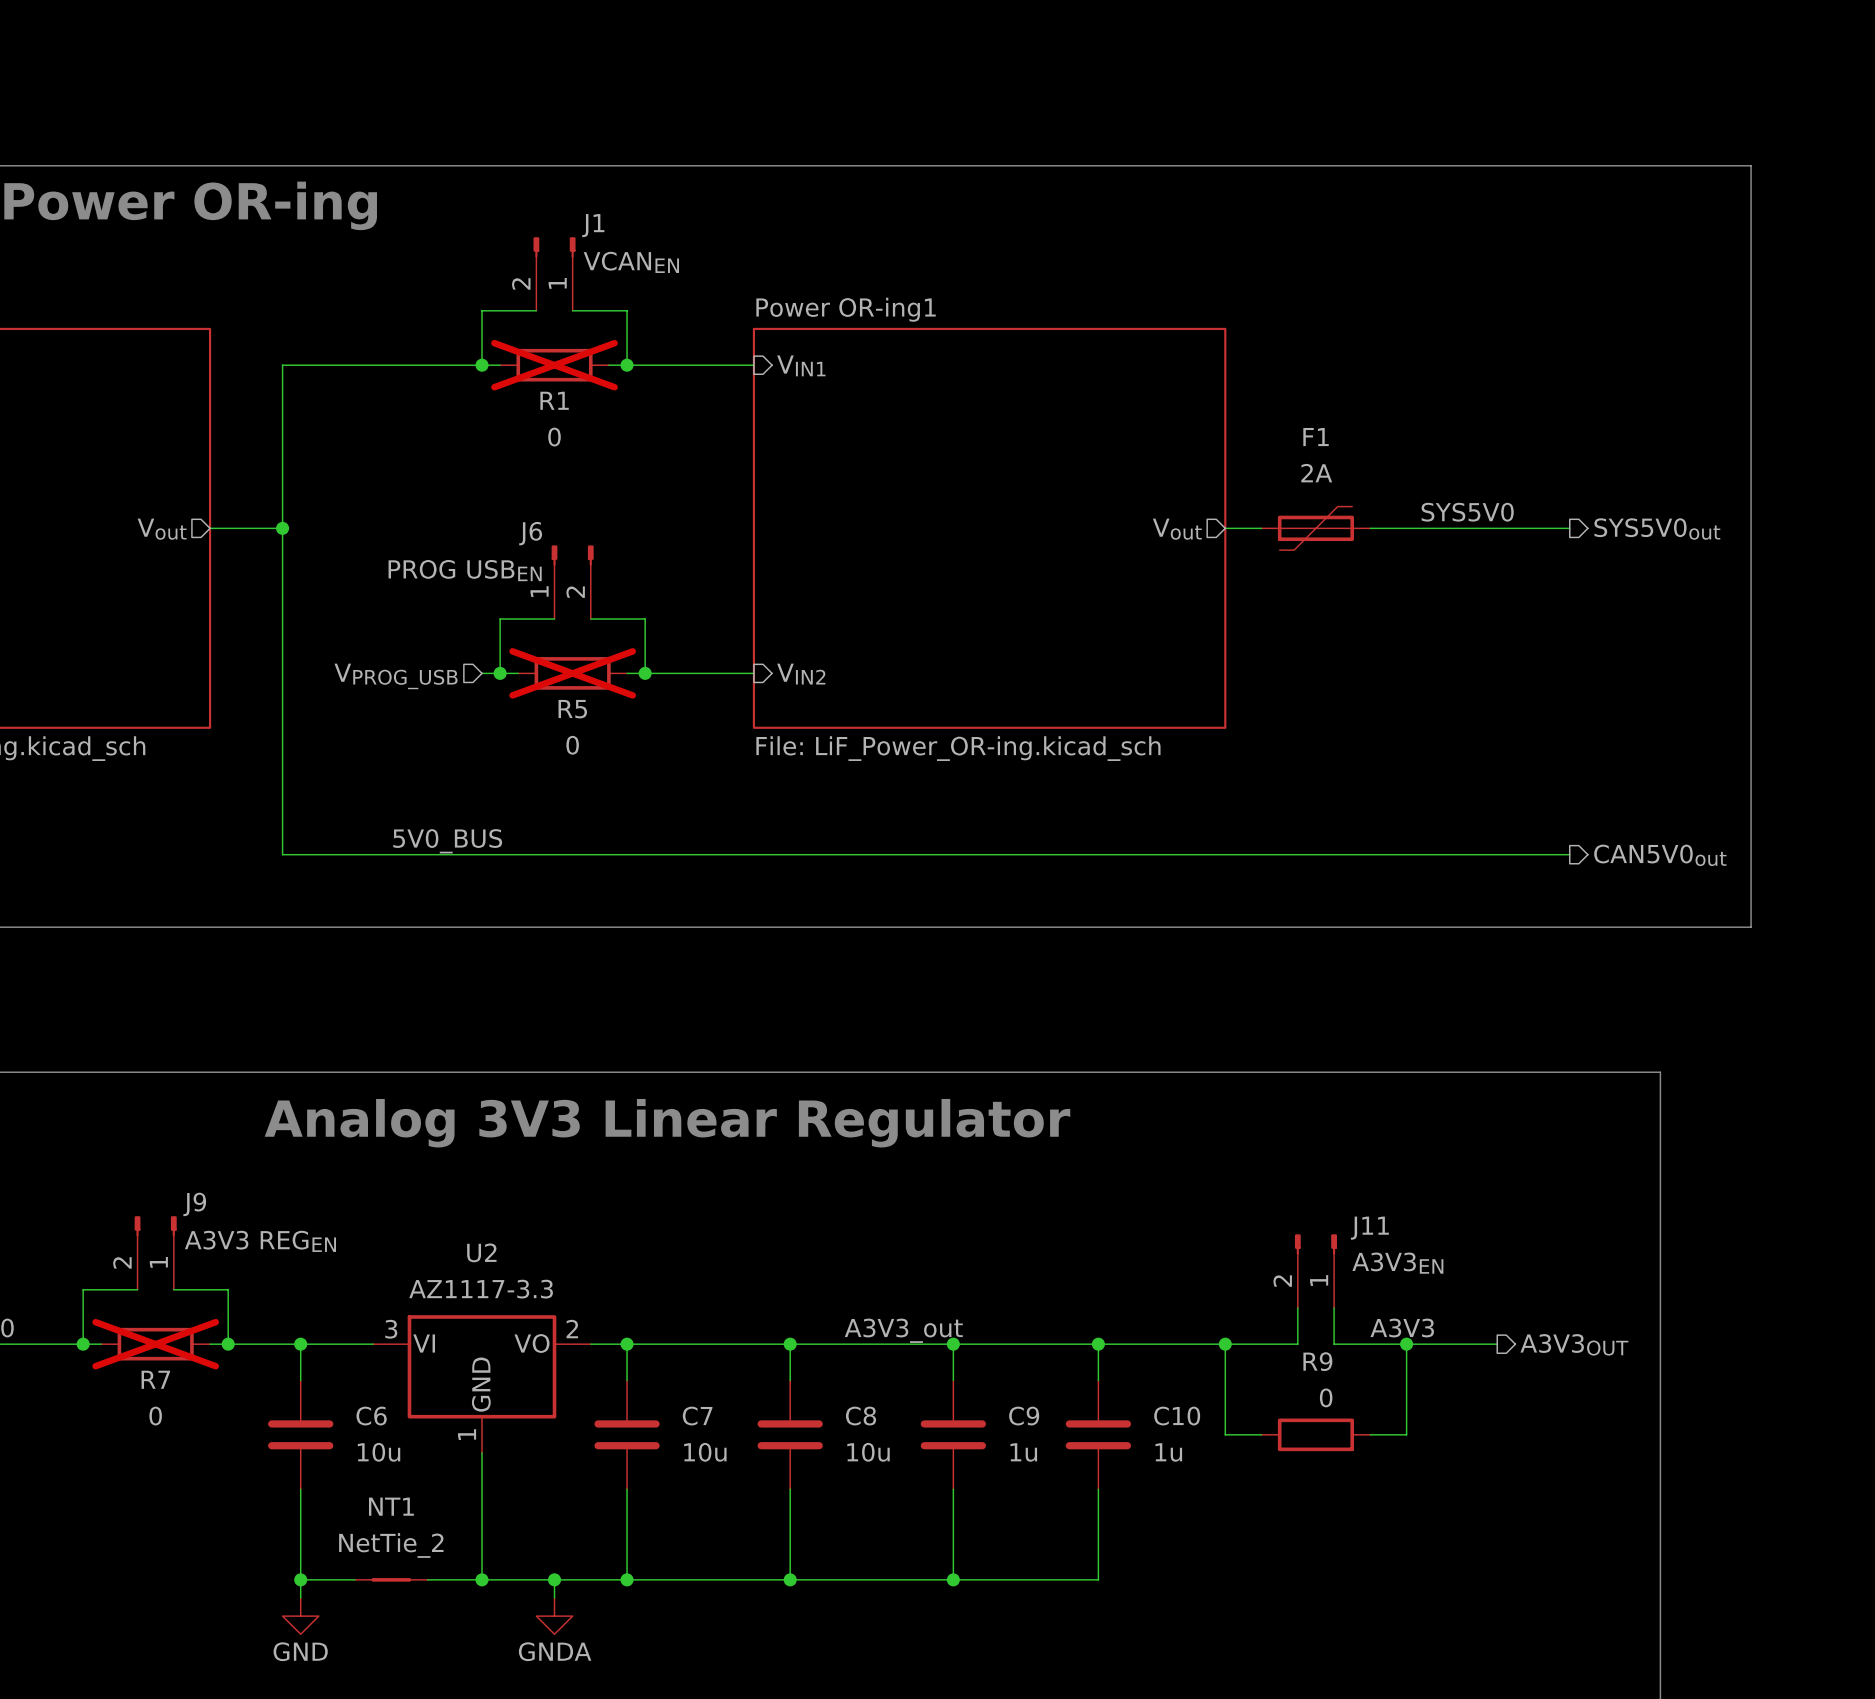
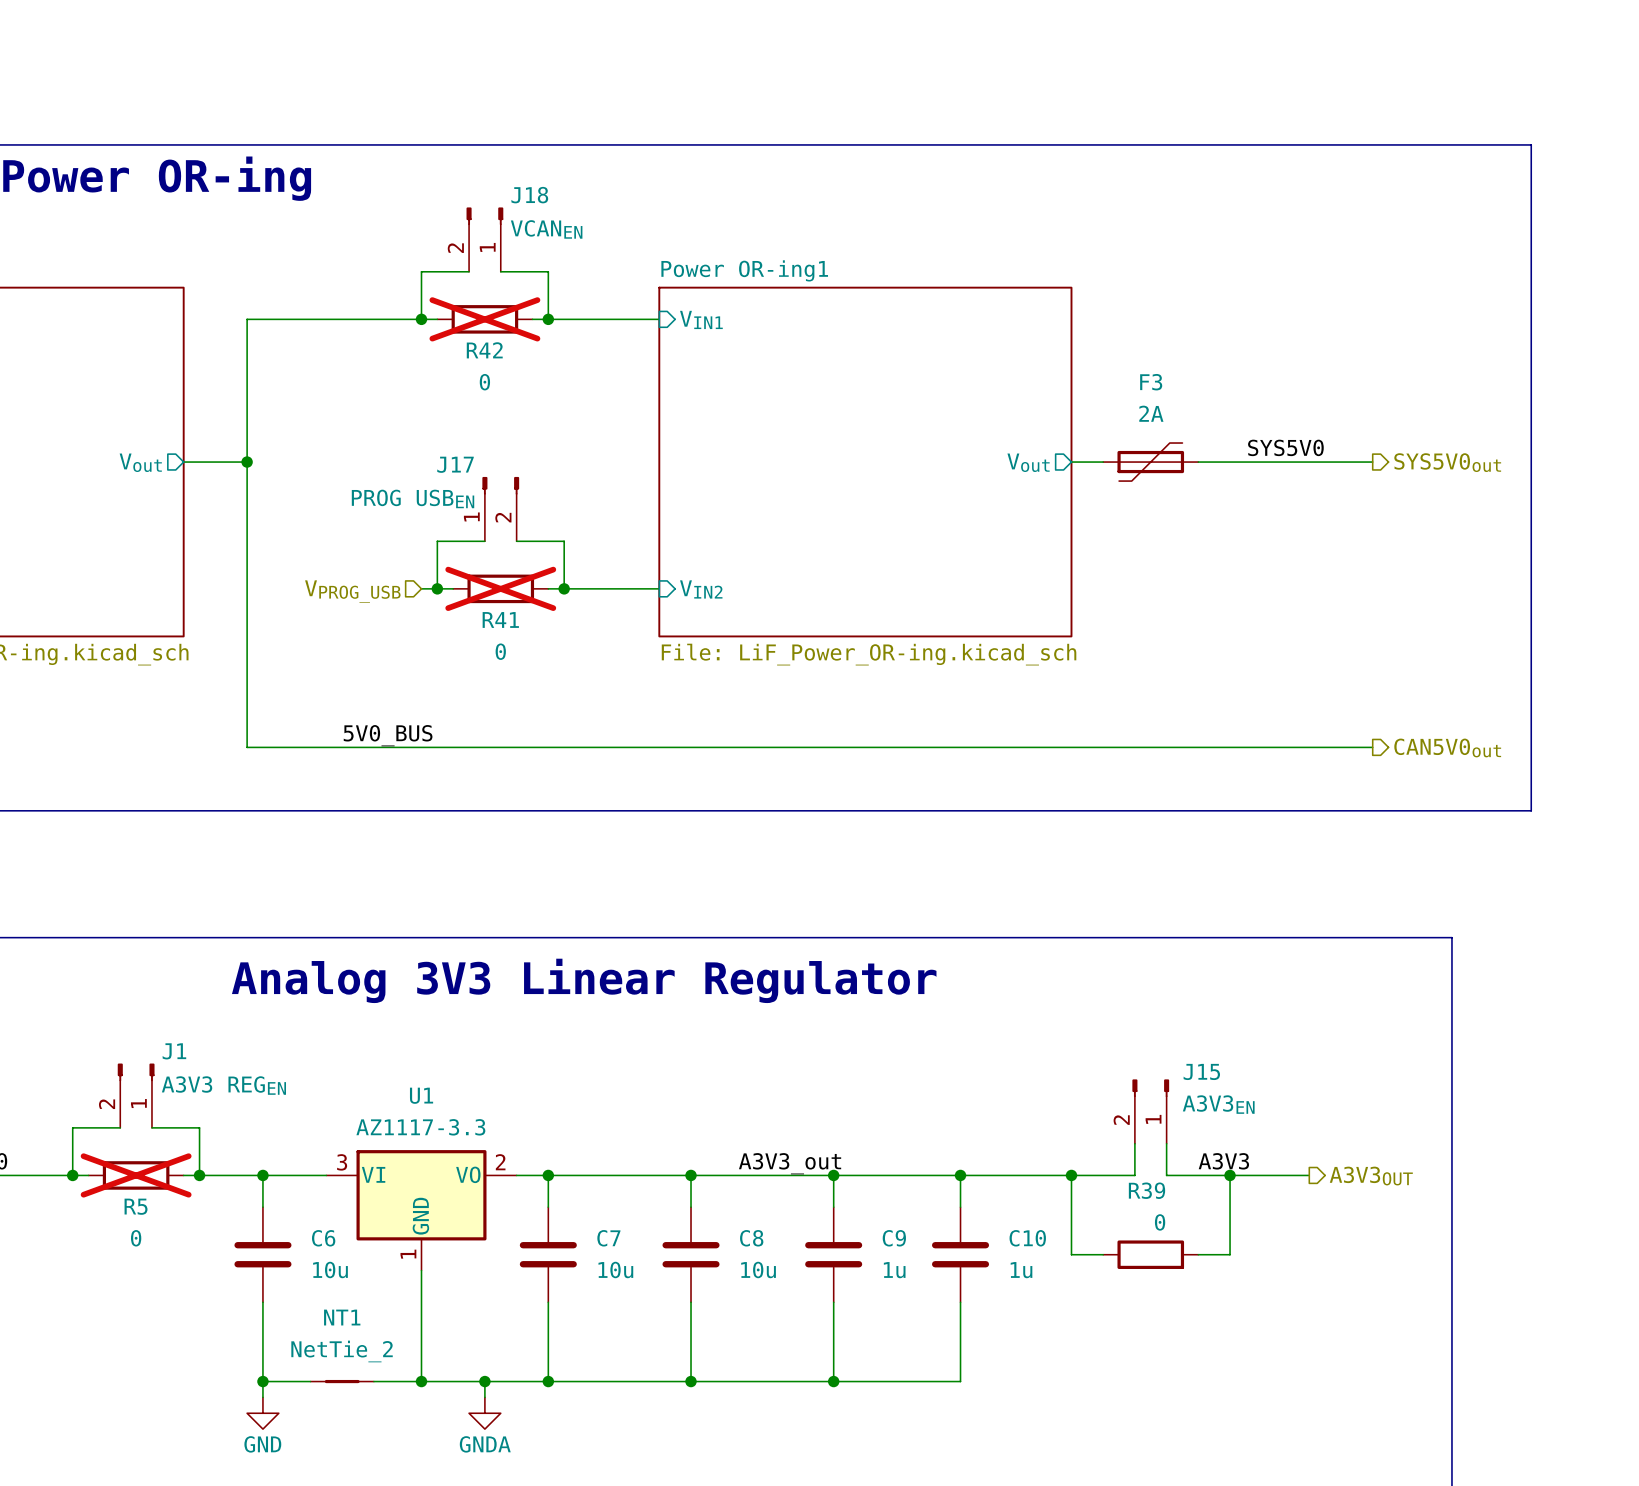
J1 name: J1 (593, 225) -> J18 (529, 195)
R1 name: R1 (554, 400) -> R42 (484, 350)
F1 name: F1 (1316, 437) -> F3 (1151, 382)
J6 name: J6 (530, 533) -> J17 (455, 464)
R5 name: R5 (572, 709) -> R41 (500, 619)
J9 name: J9 (194, 1204) -> J1 (174, 1051)
J11 name: J11 (1369, 1228) -> J15 (1201, 1071)
U2 name: U2 (481, 1252) -> U1 (421, 1095)
R9 name: R9 (1317, 1361) -> R39 (1147, 1190)
R7 name: R7 (155, 1379) -> R5 (136, 1206)

